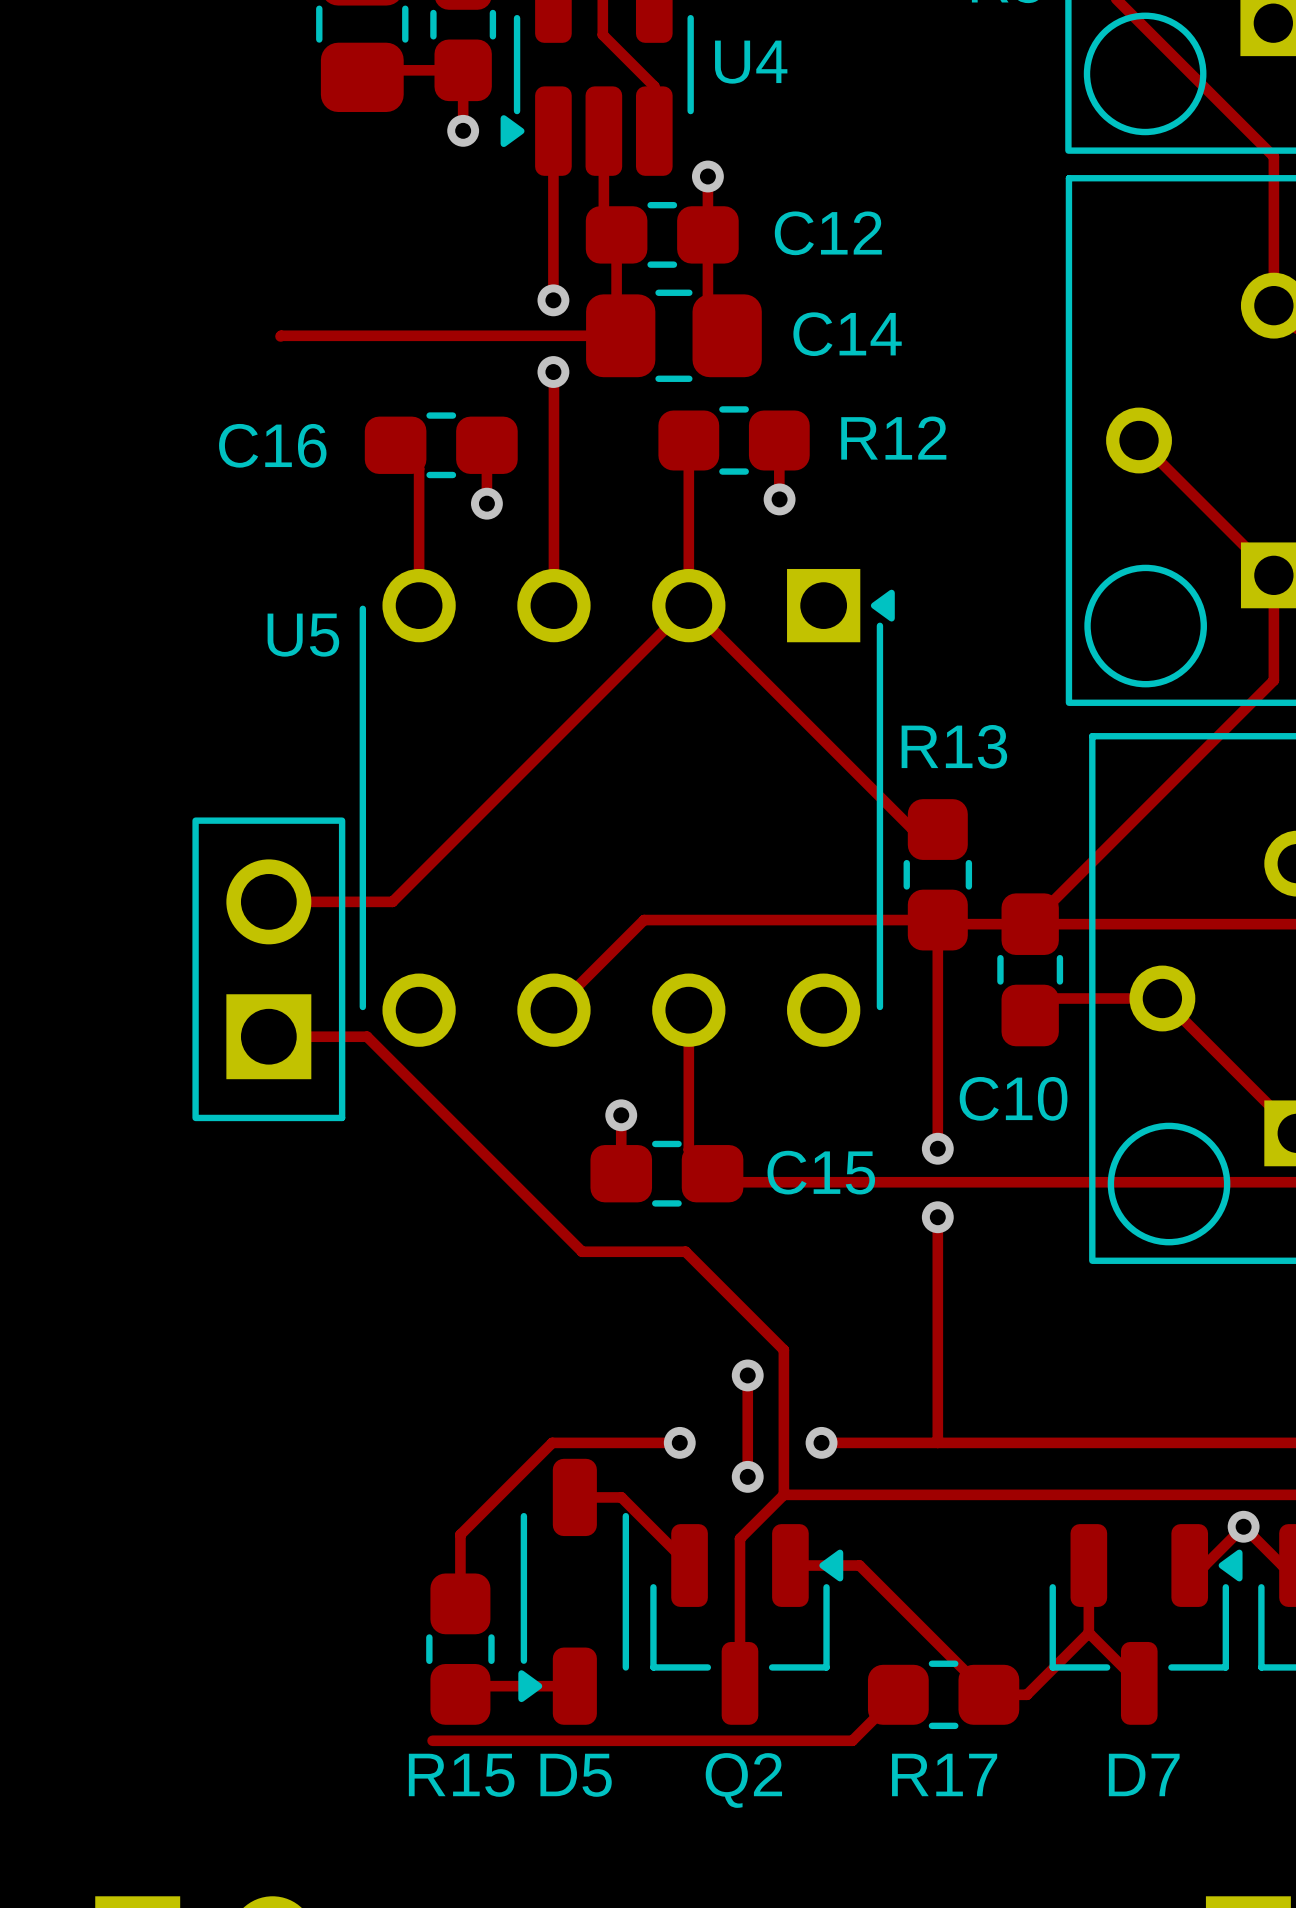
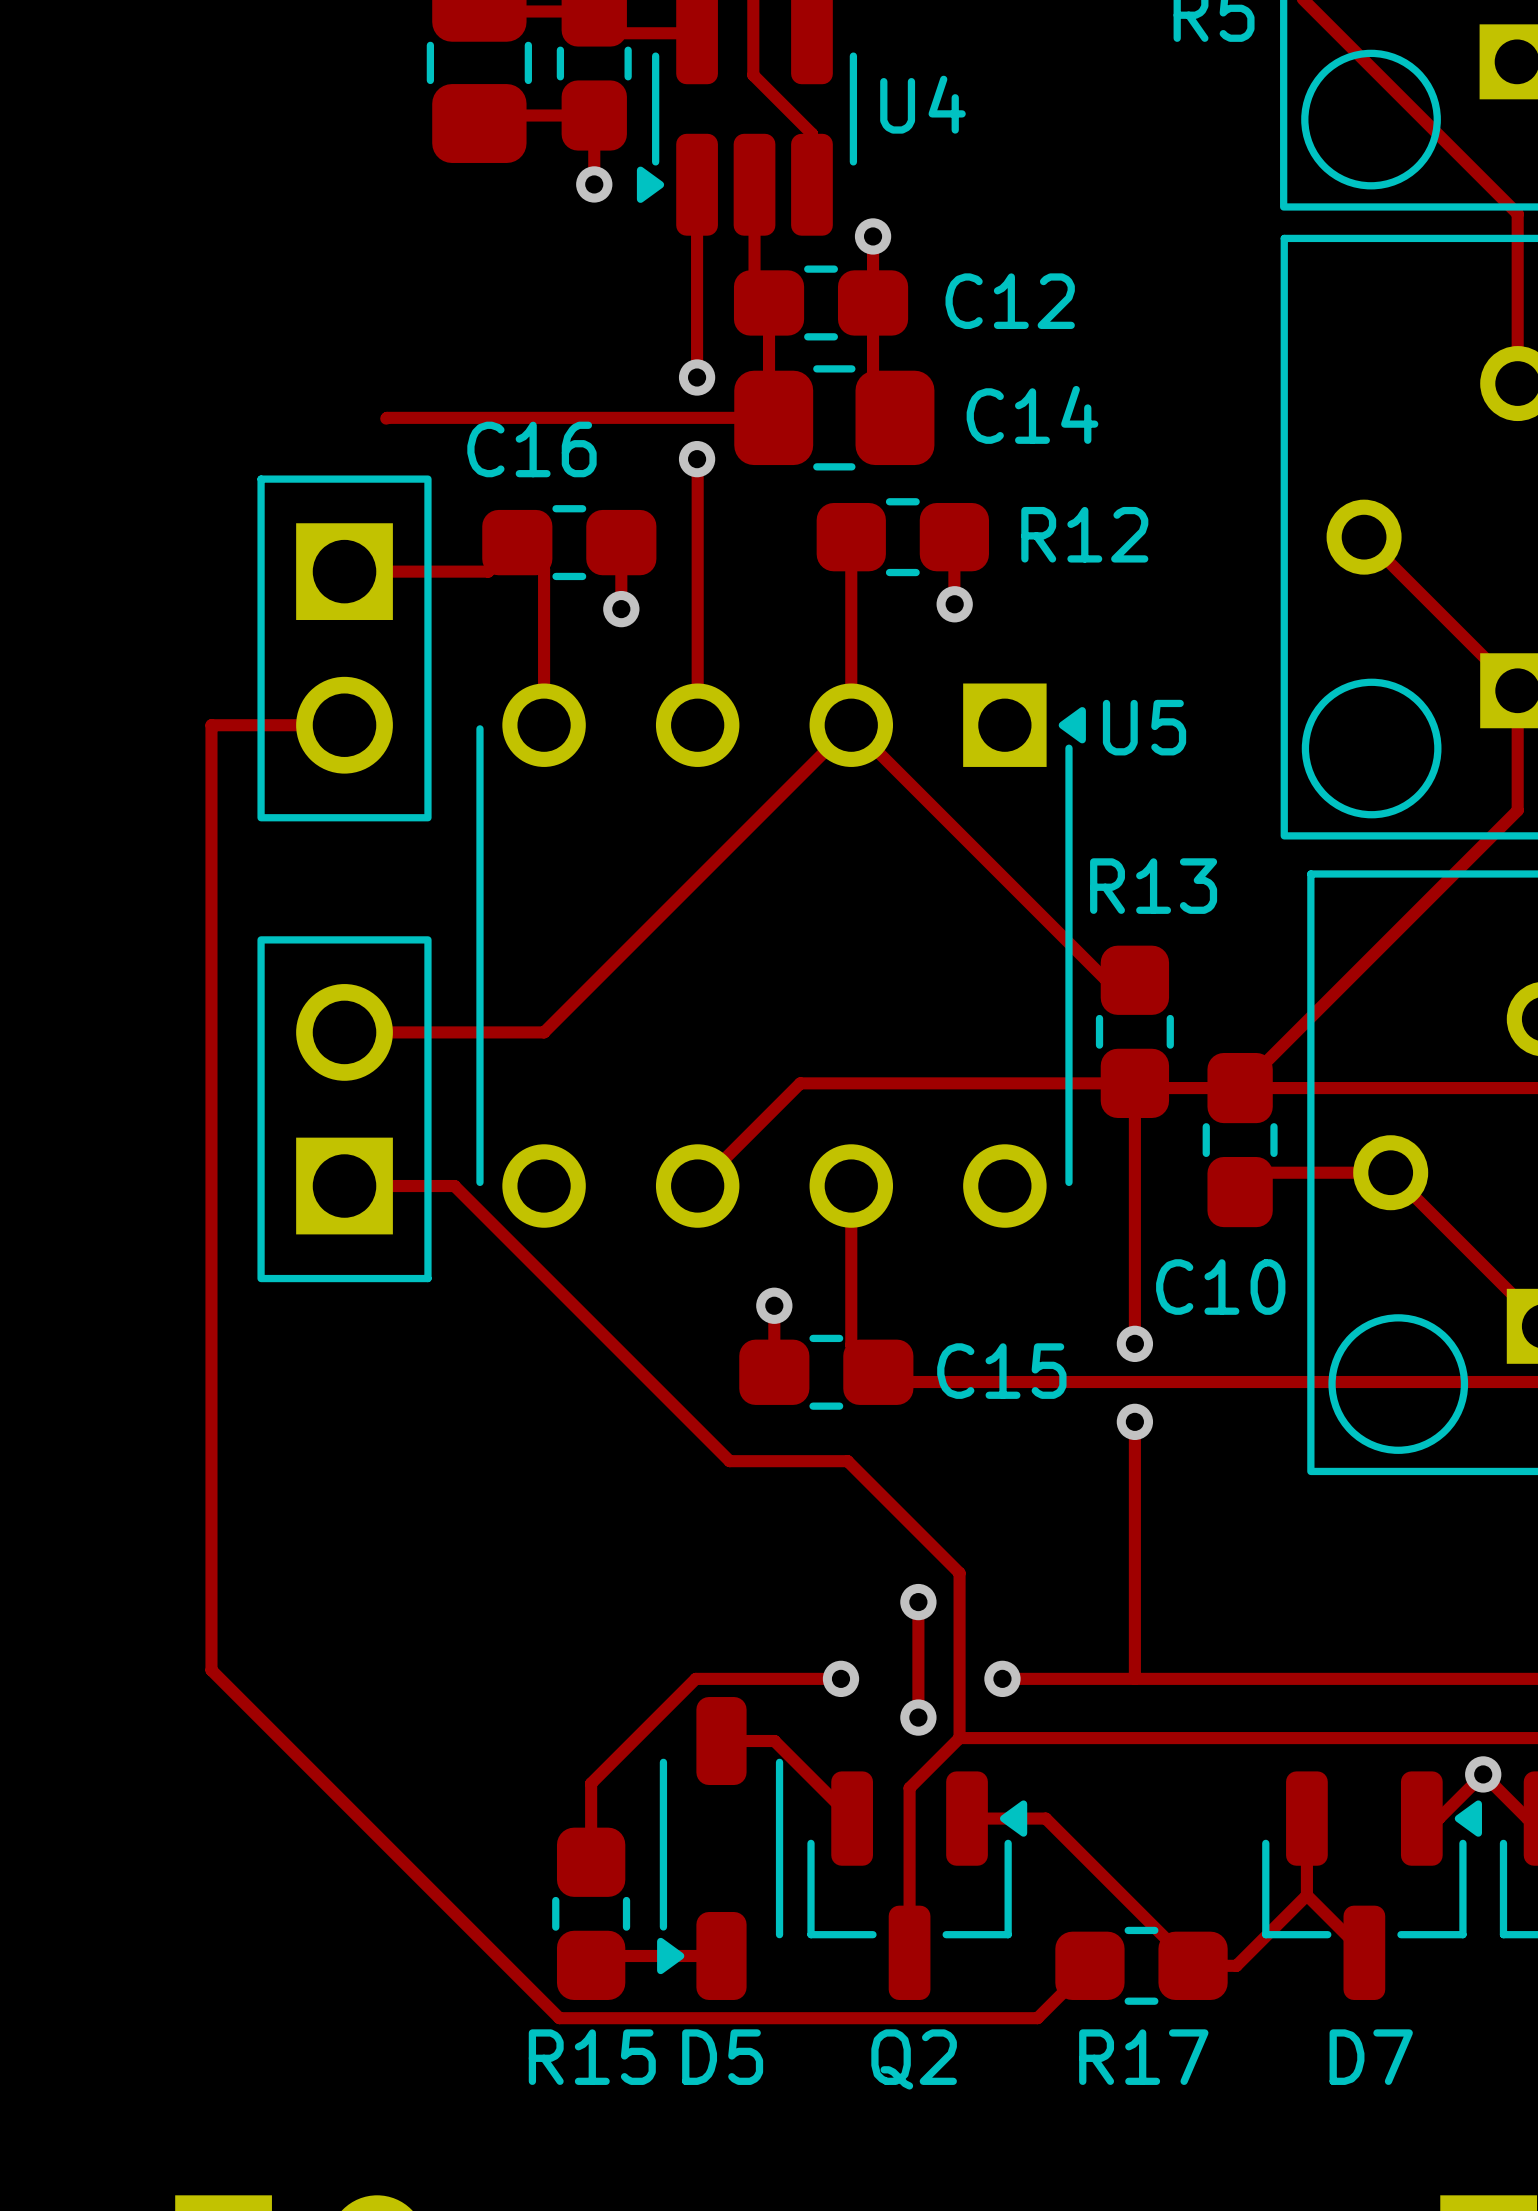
C16 name position: C16 (272, 445) -> C16 (531, 449)
track: none -> (517, 542) (488, 571) (344, 571)
part: none -> (344, 648)
track: none -> (344, 725) (211, 725) (211, 1670) (559, 2018)
U5 name position: U5 (303, 635) -> U5 (1144, 727)
track: (419, 875) (392, 901) (268, 901) -> (544, 1032) (344, 1032)
part position: (268, 969) -> (344, 1109)
track: (268, 1036) (367, 1036) -> (344, 1186) (454, 1186) (484, 1216)

